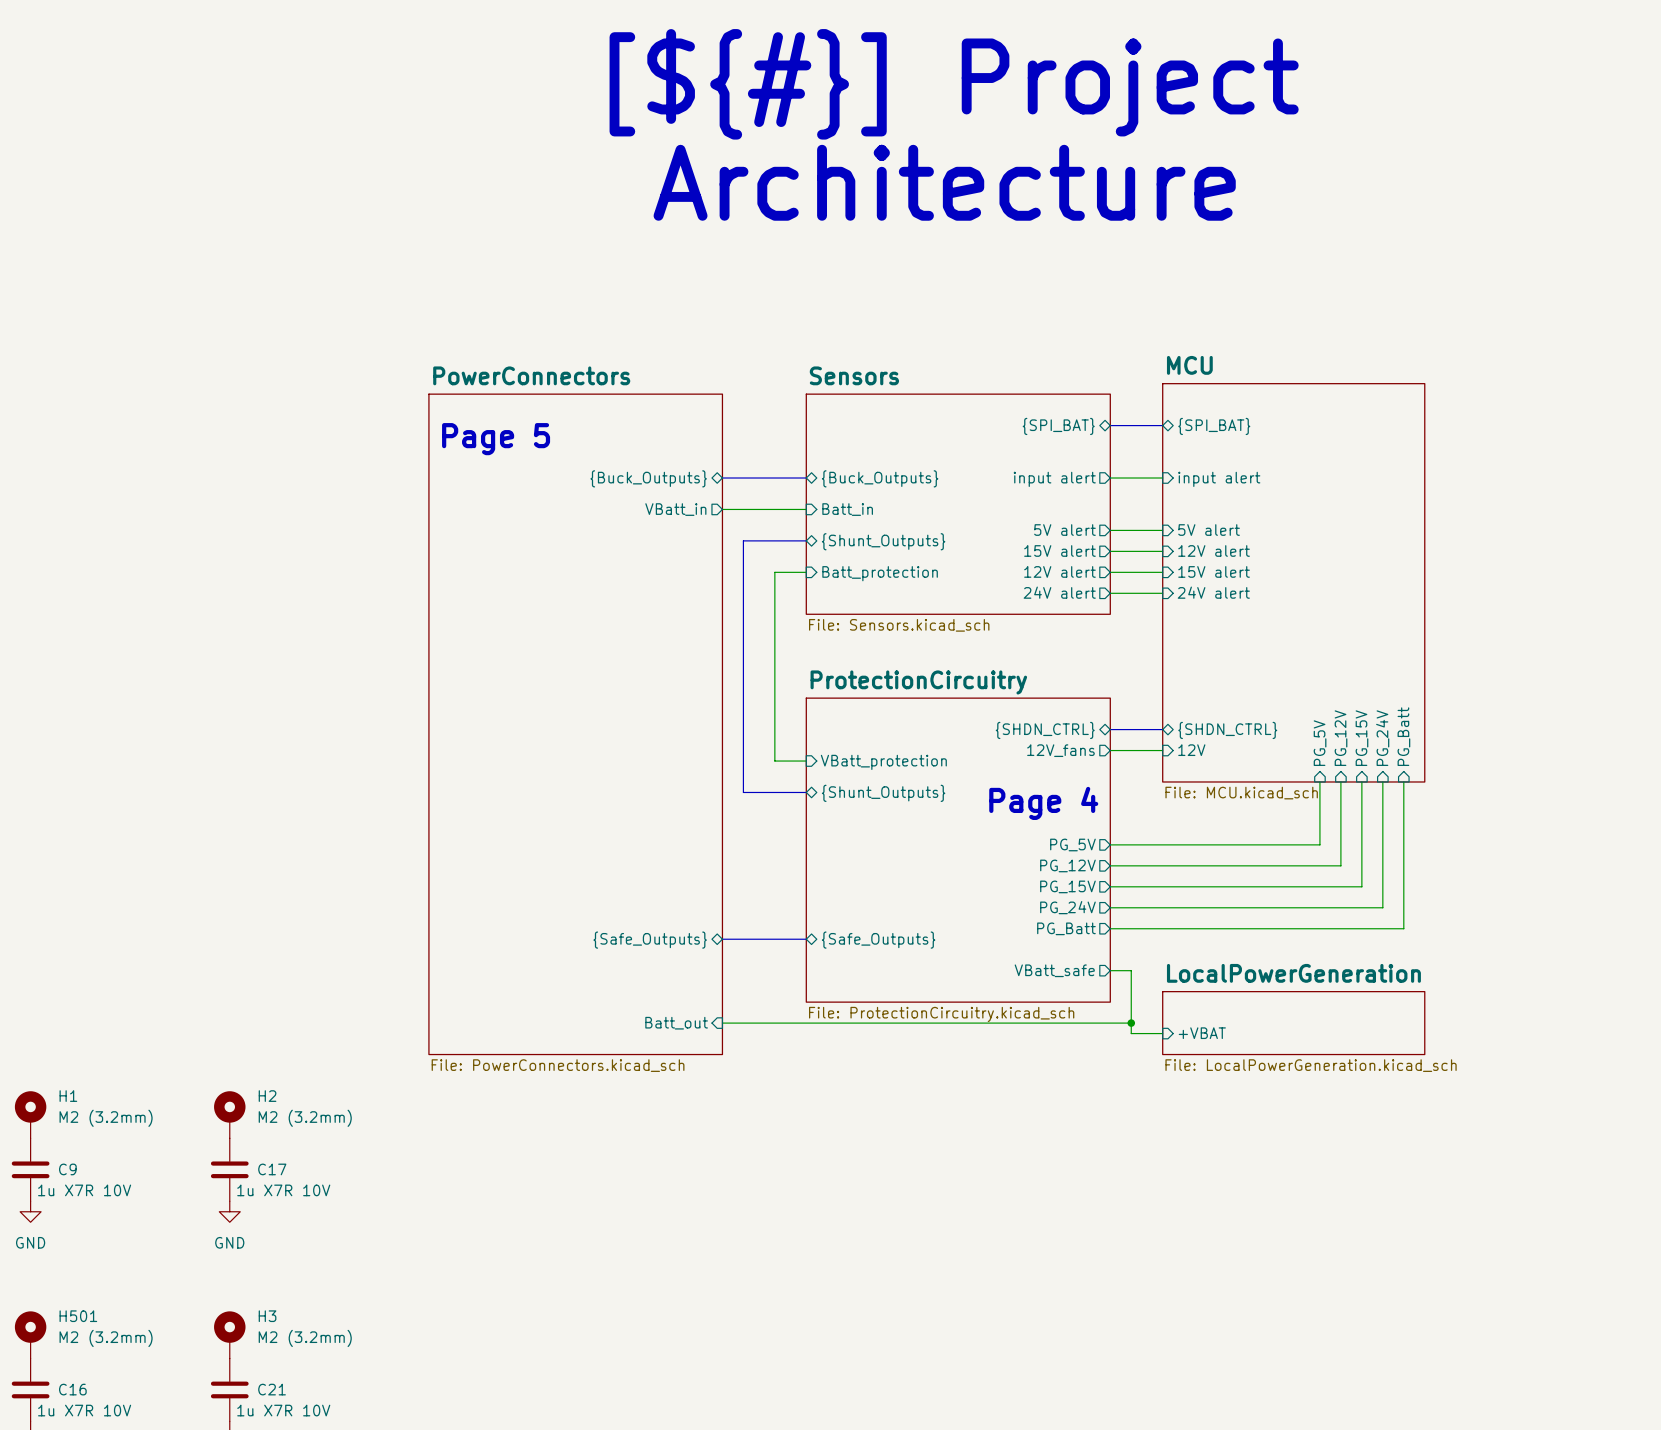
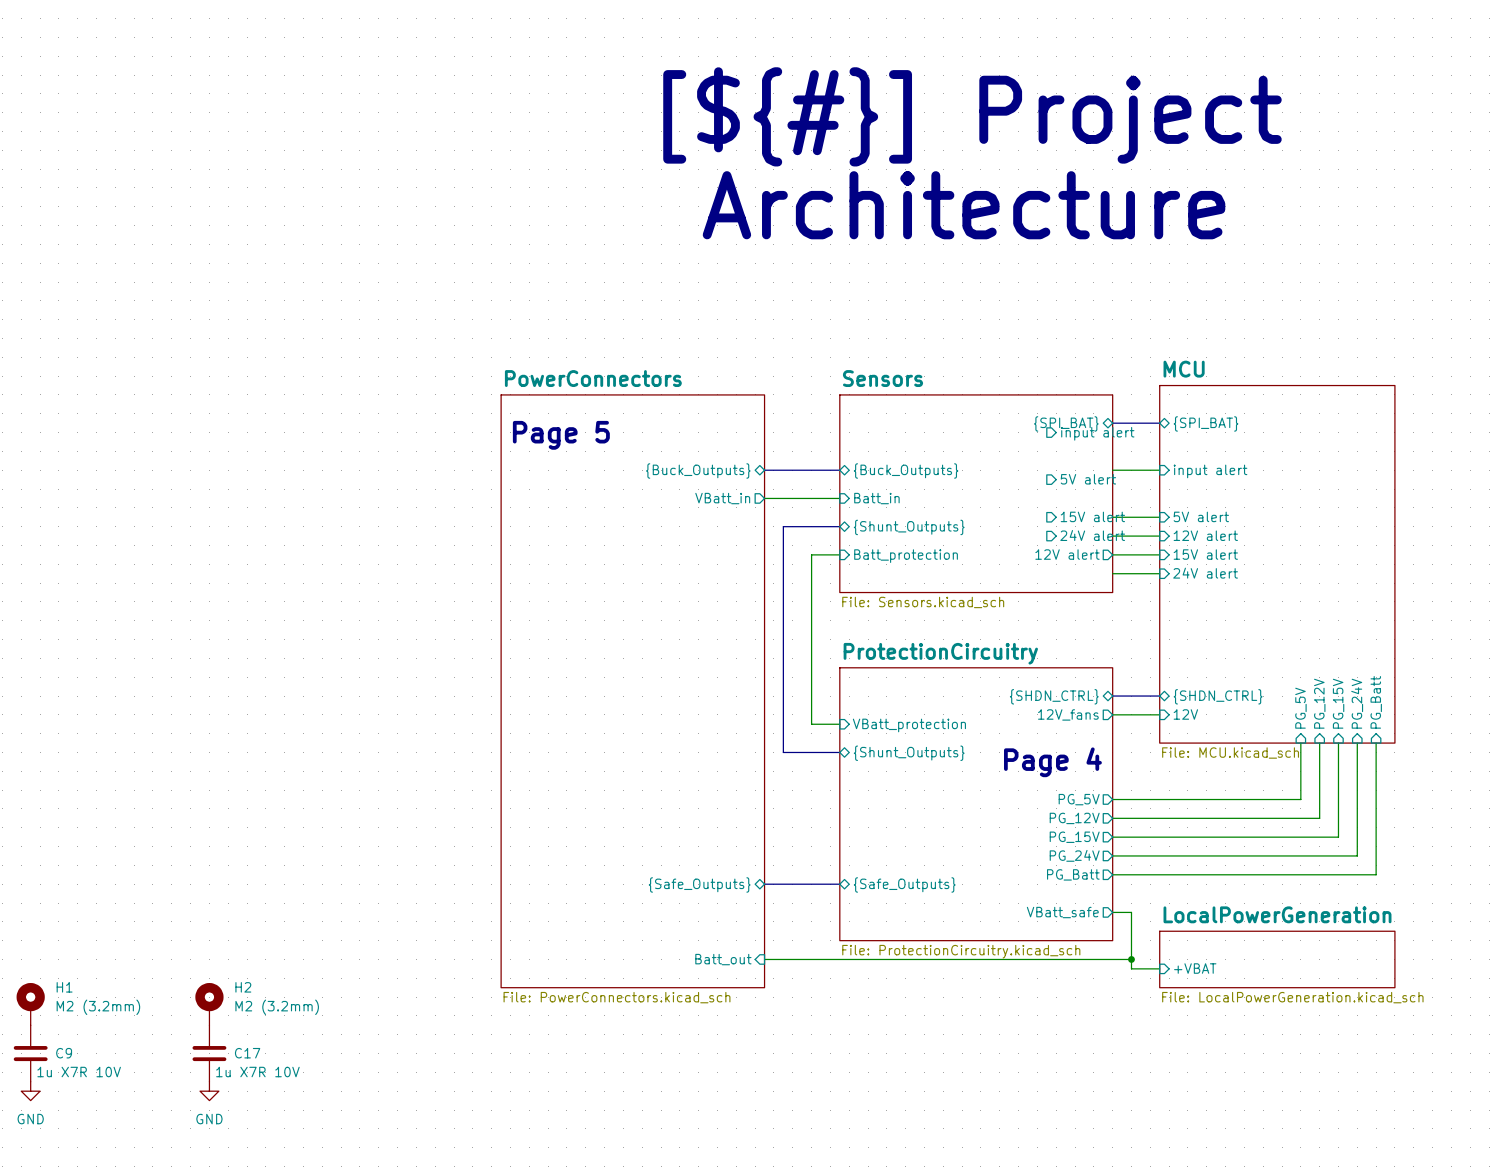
text position: [${#}] Project (954, 84) -> [${#}] Project (972, 116)
text position: Architecture (944, 182) -> Architecture (964, 205)
bus: (1110, 425) (1162, 425) -> (1112, 423) (1159, 423)
sheet pin: {SPI_BAT} (1058, 426) -> none
sheet pin rotation: 0° (1214, 426) -> 180° (1066, 423)
text position: Page 5 (496, 439) -> Page 5 (561, 435)
sheet pin: none -> {SPI_BAT} (1206, 423)
sheet pin: {Buck_Outputs} (648, 478) -> none
bus: (722, 478) (806, 478) -> (764, 470) (839, 470)
sheet pin rotation: 0° (880, 478) -> 180° (698, 470)
wire: (1110, 478) (1162, 478) -> (1112, 470) (1159, 470)
sheet pin: input alert (1054, 479) -> none
sheet Sensors position: (958, 504) -> (976, 493)
sheet pin position: VBatt_in (675, 509) -> VBatt_in (722, 498)
wire: (722, 509) (806, 509) -> (764, 498) (839, 498)
sheet pin position: Batt_in (847, 509) -> Batt_in (876, 498)
sheet pin: none -> input alert (1210, 471)
sheet pin: 5V alert (1064, 530) -> none
wire: (1110, 530) (1162, 530) -> (1112, 517) (1159, 517)
bus: (806, 540) (743, 540) (743, 792) (806, 792) -> (839, 526) (783, 526) (783, 752) (839, 752)
sheet pin: {Shunt_Outputs} (883, 541) -> {Buck_Outputs} (906, 470)
sheet pin: 15V alert (1059, 550) -> none
sheet pin: 12V alert (1214, 550) -> none
wire: (1110, 551) (1162, 551) -> (1112, 536) (1159, 536)
sheet pin: 12V alert (1059, 571) -> none
sheet pin: none -> 5V alert (1201, 516)
wire: (806, 572) (774, 572) (774, 761) (806, 761) -> (839, 554) (811, 554) (811, 724) (839, 724)
wire: (1110, 572) (1162, 572) -> (1112, 554) (1159, 554)
sheet pin position: Batt_protection (880, 573) -> Batt_protection (906, 556)
sheet MCU position: (1293, 582) -> (1277, 564)
sheet pin: none -> {Shunt_Outputs} (909, 527)
sheet pin: 24V alert (1059, 592) -> none
sheet pin: none -> 12V alert (1205, 535)
wire: (1110, 593) (1162, 593) -> (1112, 573) (1159, 573)
sheet pin: none -> 12V alert (1067, 554)
sheet pin: none -> 15V alert (1205, 554)
sheet pin: none -> 24V alert (1205, 573)
sheet PowerConnectors position: (575, 724) -> (632, 691)
bus: (1110, 729) (1162, 729) -> (1112, 696) (1159, 696)
sheet pin: {SHDN_CTRL} (1045, 730) -> none
sheet pin rotation: 0° (1227, 730) -> 180° (1054, 696)
sheet pin position: PG_Batt (1403, 736) -> PG_Batt (1376, 702)
sheet pin: PG_12V (1341, 738) -> none
sheet pin: PG_15V (1361, 738) -> none
sheet pin: PG_24V (1382, 738) -> none
sheet pin: PG_5V (1320, 743) -> none
sheet pin position: 12V_fans (1060, 750) -> 12V_fans (1068, 714)
wire: (1110, 750) (1162, 750) -> (1112, 714) (1159, 714)
sheet pin position: 12V (1191, 750) -> 12V (1185, 714)
sheet pin position: VBatt_protection (883, 762) -> VBatt_protection (909, 725)
sheet pin: none -> {SHDN_CTRL} (1218, 696)
sheet pin: none -> PG_12V (1319, 703)
sheet pin: none -> PG_15V (1338, 703)
sheet pin: none -> PG_24V (1357, 703)
wire: (1319, 781) (1319, 844) (1110, 844) -> none
wire: (1340, 781) (1340, 865) (1110, 865) -> none
wire: (1361, 781) (1361, 886) -> (1300, 743) (1300, 799) (1225, 799)
wire: (1382, 781) (1382, 907) -> (1319, 743) (1319, 818) (1244, 818)
wire: (1403, 781) (1403, 928) -> (1338, 743) (1338, 837) (1263, 837)
sheet pin: none -> PG_5V (1300, 708)
sheet pin: {Shunt_Outputs} (883, 793) -> none
text position: Page 4 (1043, 803) -> Page 4 (1052, 762)
wire: none -> (1357, 743) (1357, 855) (1112, 855)
wire: none -> (1376, 743) (1376, 874) (1112, 874)
sheet pin: none -> {Shunt_Outputs} (909, 753)
sheet pin: PG_5V (1072, 844) -> none
sheet ProtectionCircuitry position: (958, 850) -> (976, 804)
sheet pin: PG_12V (1067, 865) -> none
sheet pin: PG_15V (1067, 886) -> none
wire: (1110, 886) (1236, 886) -> none
sheet pin: none -> PG_5V (1079, 799)
sheet pin: PG_24V (1067, 907) -> none
wire: (1110, 907) (1236, 907) -> none
sheet pin: none -> PG_12V (1074, 818)
sheet pin position: PG_Batt (1066, 928) -> PG_Batt (1073, 874)
wire: (1110, 928) (1236, 928) -> none
sheet pin: none -> PG_15V (1074, 837)
bus: (722, 939) (806, 939) -> (764, 884) (839, 884)
sheet pin: {Safe_Outputs} (650, 940) -> none
sheet pin rotation: 0° (878, 940) -> 180° (699, 884)
sheet pin: none -> PG_24V (1074, 855)
sheet pin position: VBatt_safe (1054, 970) -> VBatt_safe (1062, 912)
wire: (1110, 970) (1131, 970) (1131, 1033) (1162, 1033) -> (1112, 912) (1131, 912) (1131, 968) (1159, 968)
sheet pin: none -> {Safe_Outputs} (904, 884)
sheet pin position: Batt_out (676, 1023) -> Batt_out (723, 959)
wire: (722, 1023) (1131, 1023) -> (764, 959) (1131, 959)
junction: (1131, 1023) -> none
sheet LocalPowerGeneration position: (1293, 1023) -> (1277, 959)
sheet pin position: +VBAT (1202, 1033) -> +VBAT (1195, 968)
junction: none -> (1131, 959)

